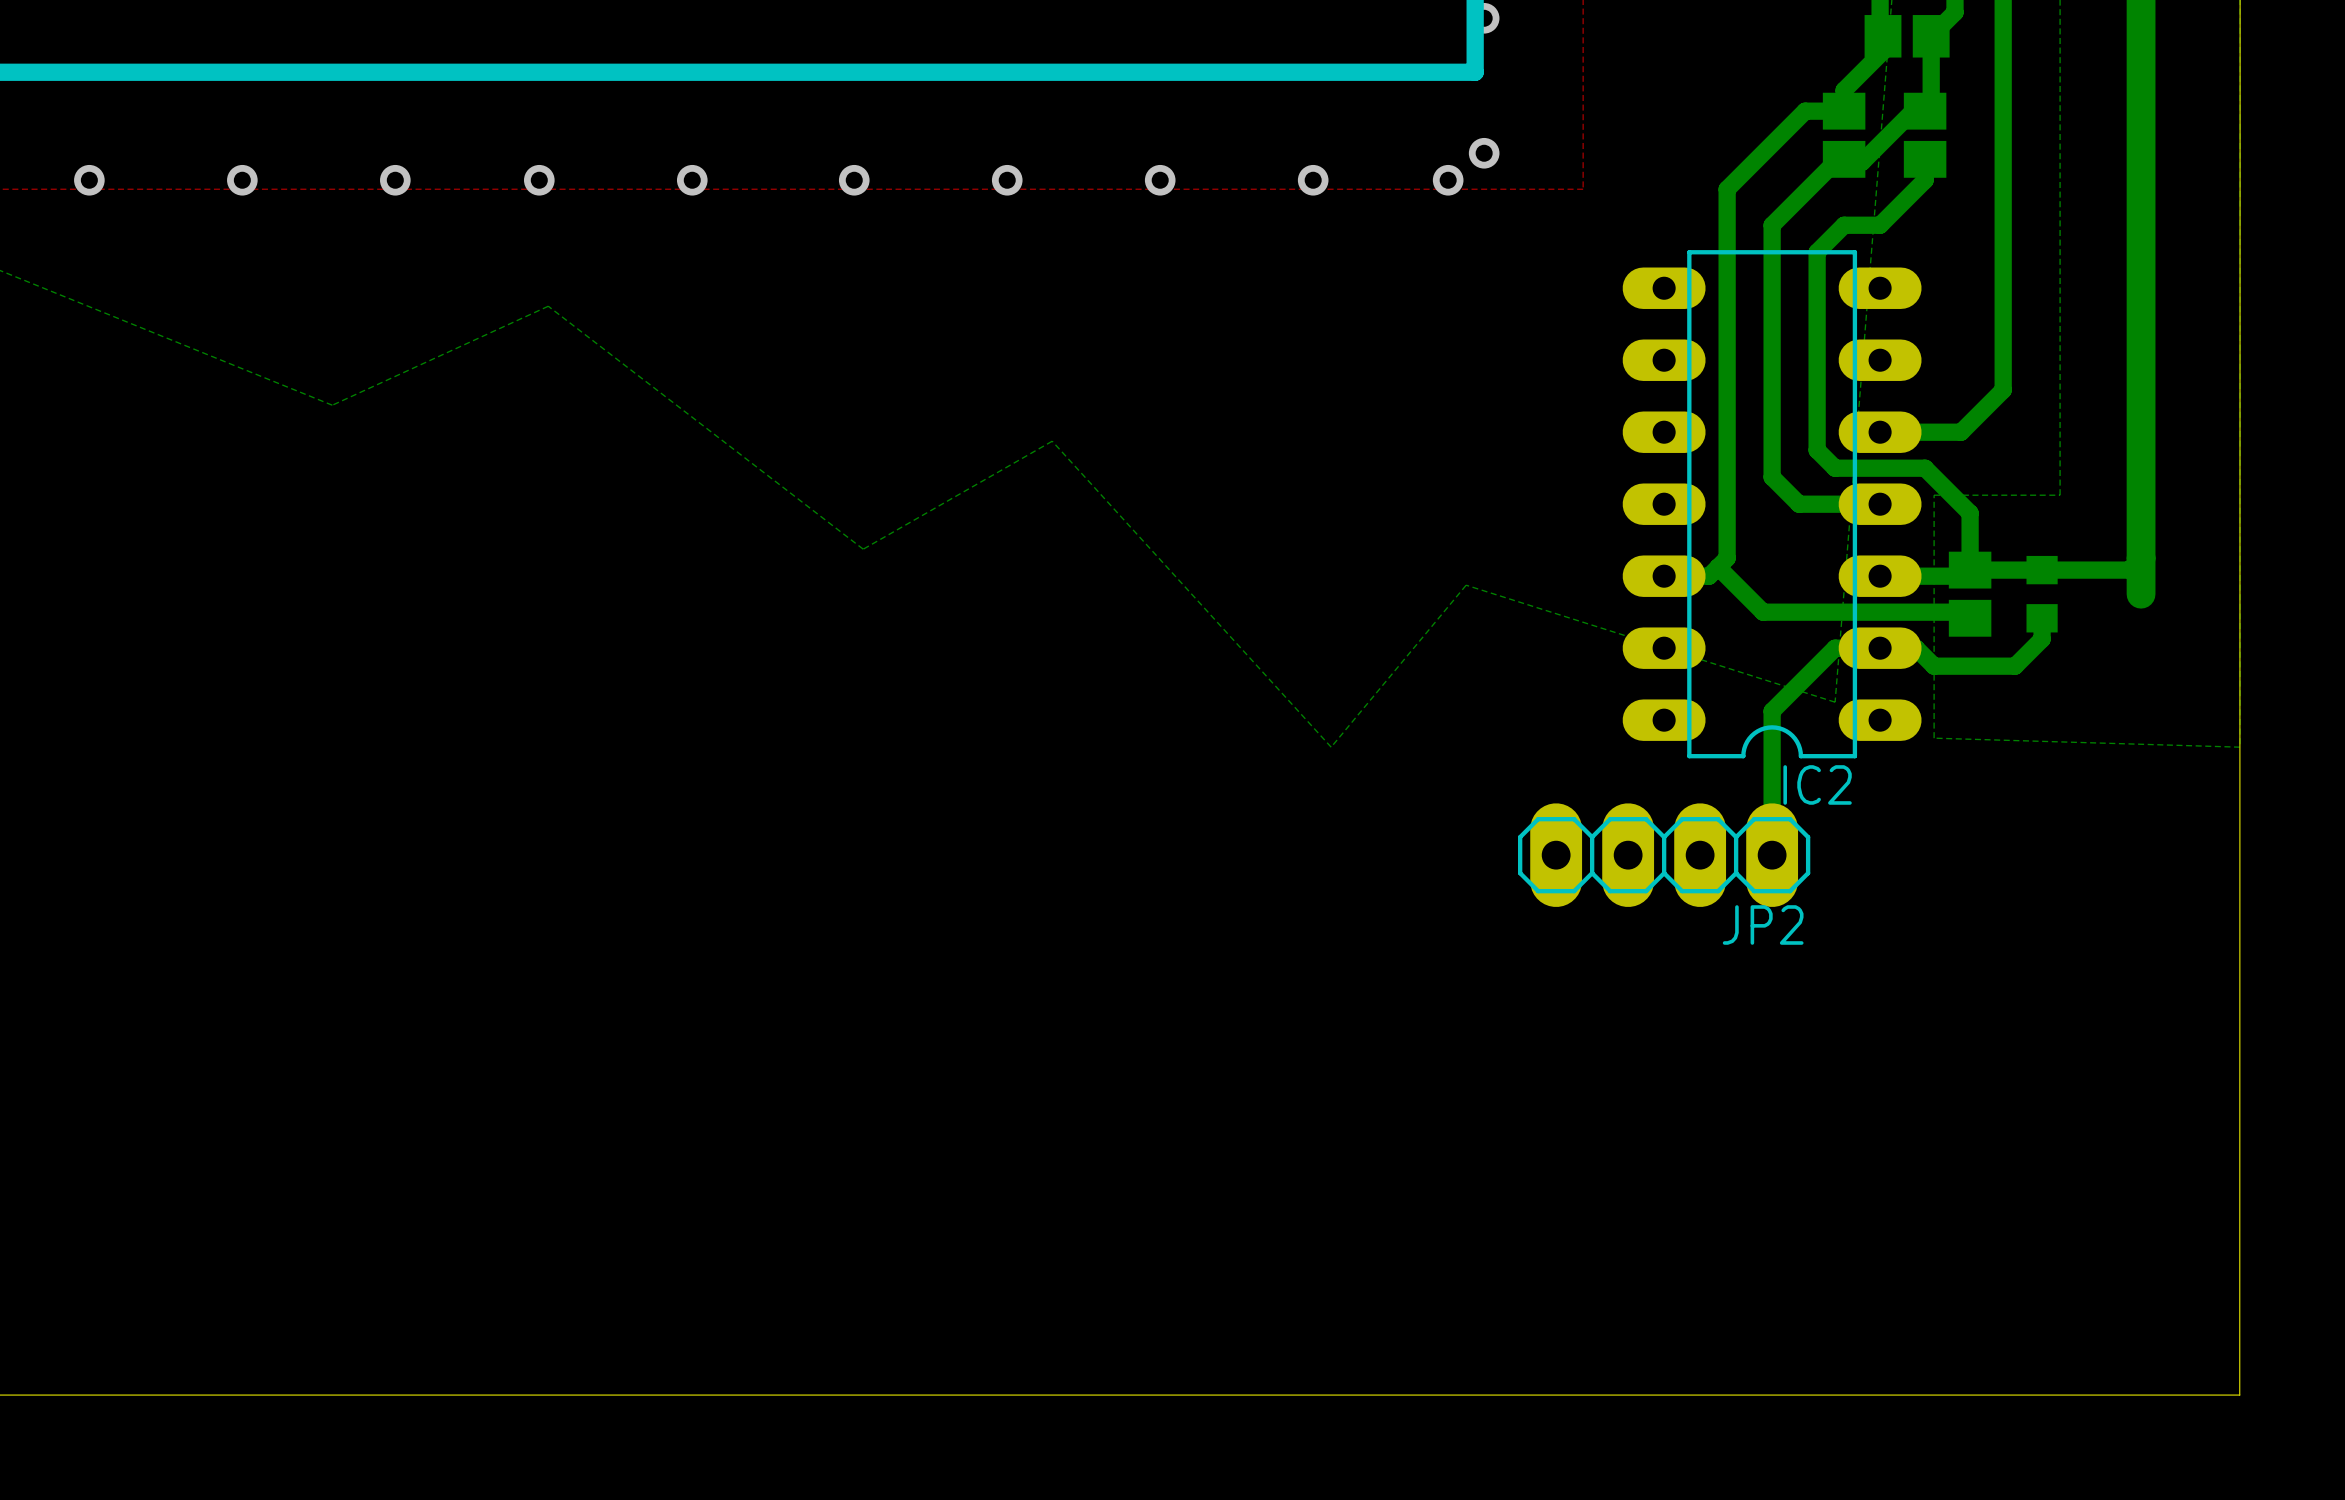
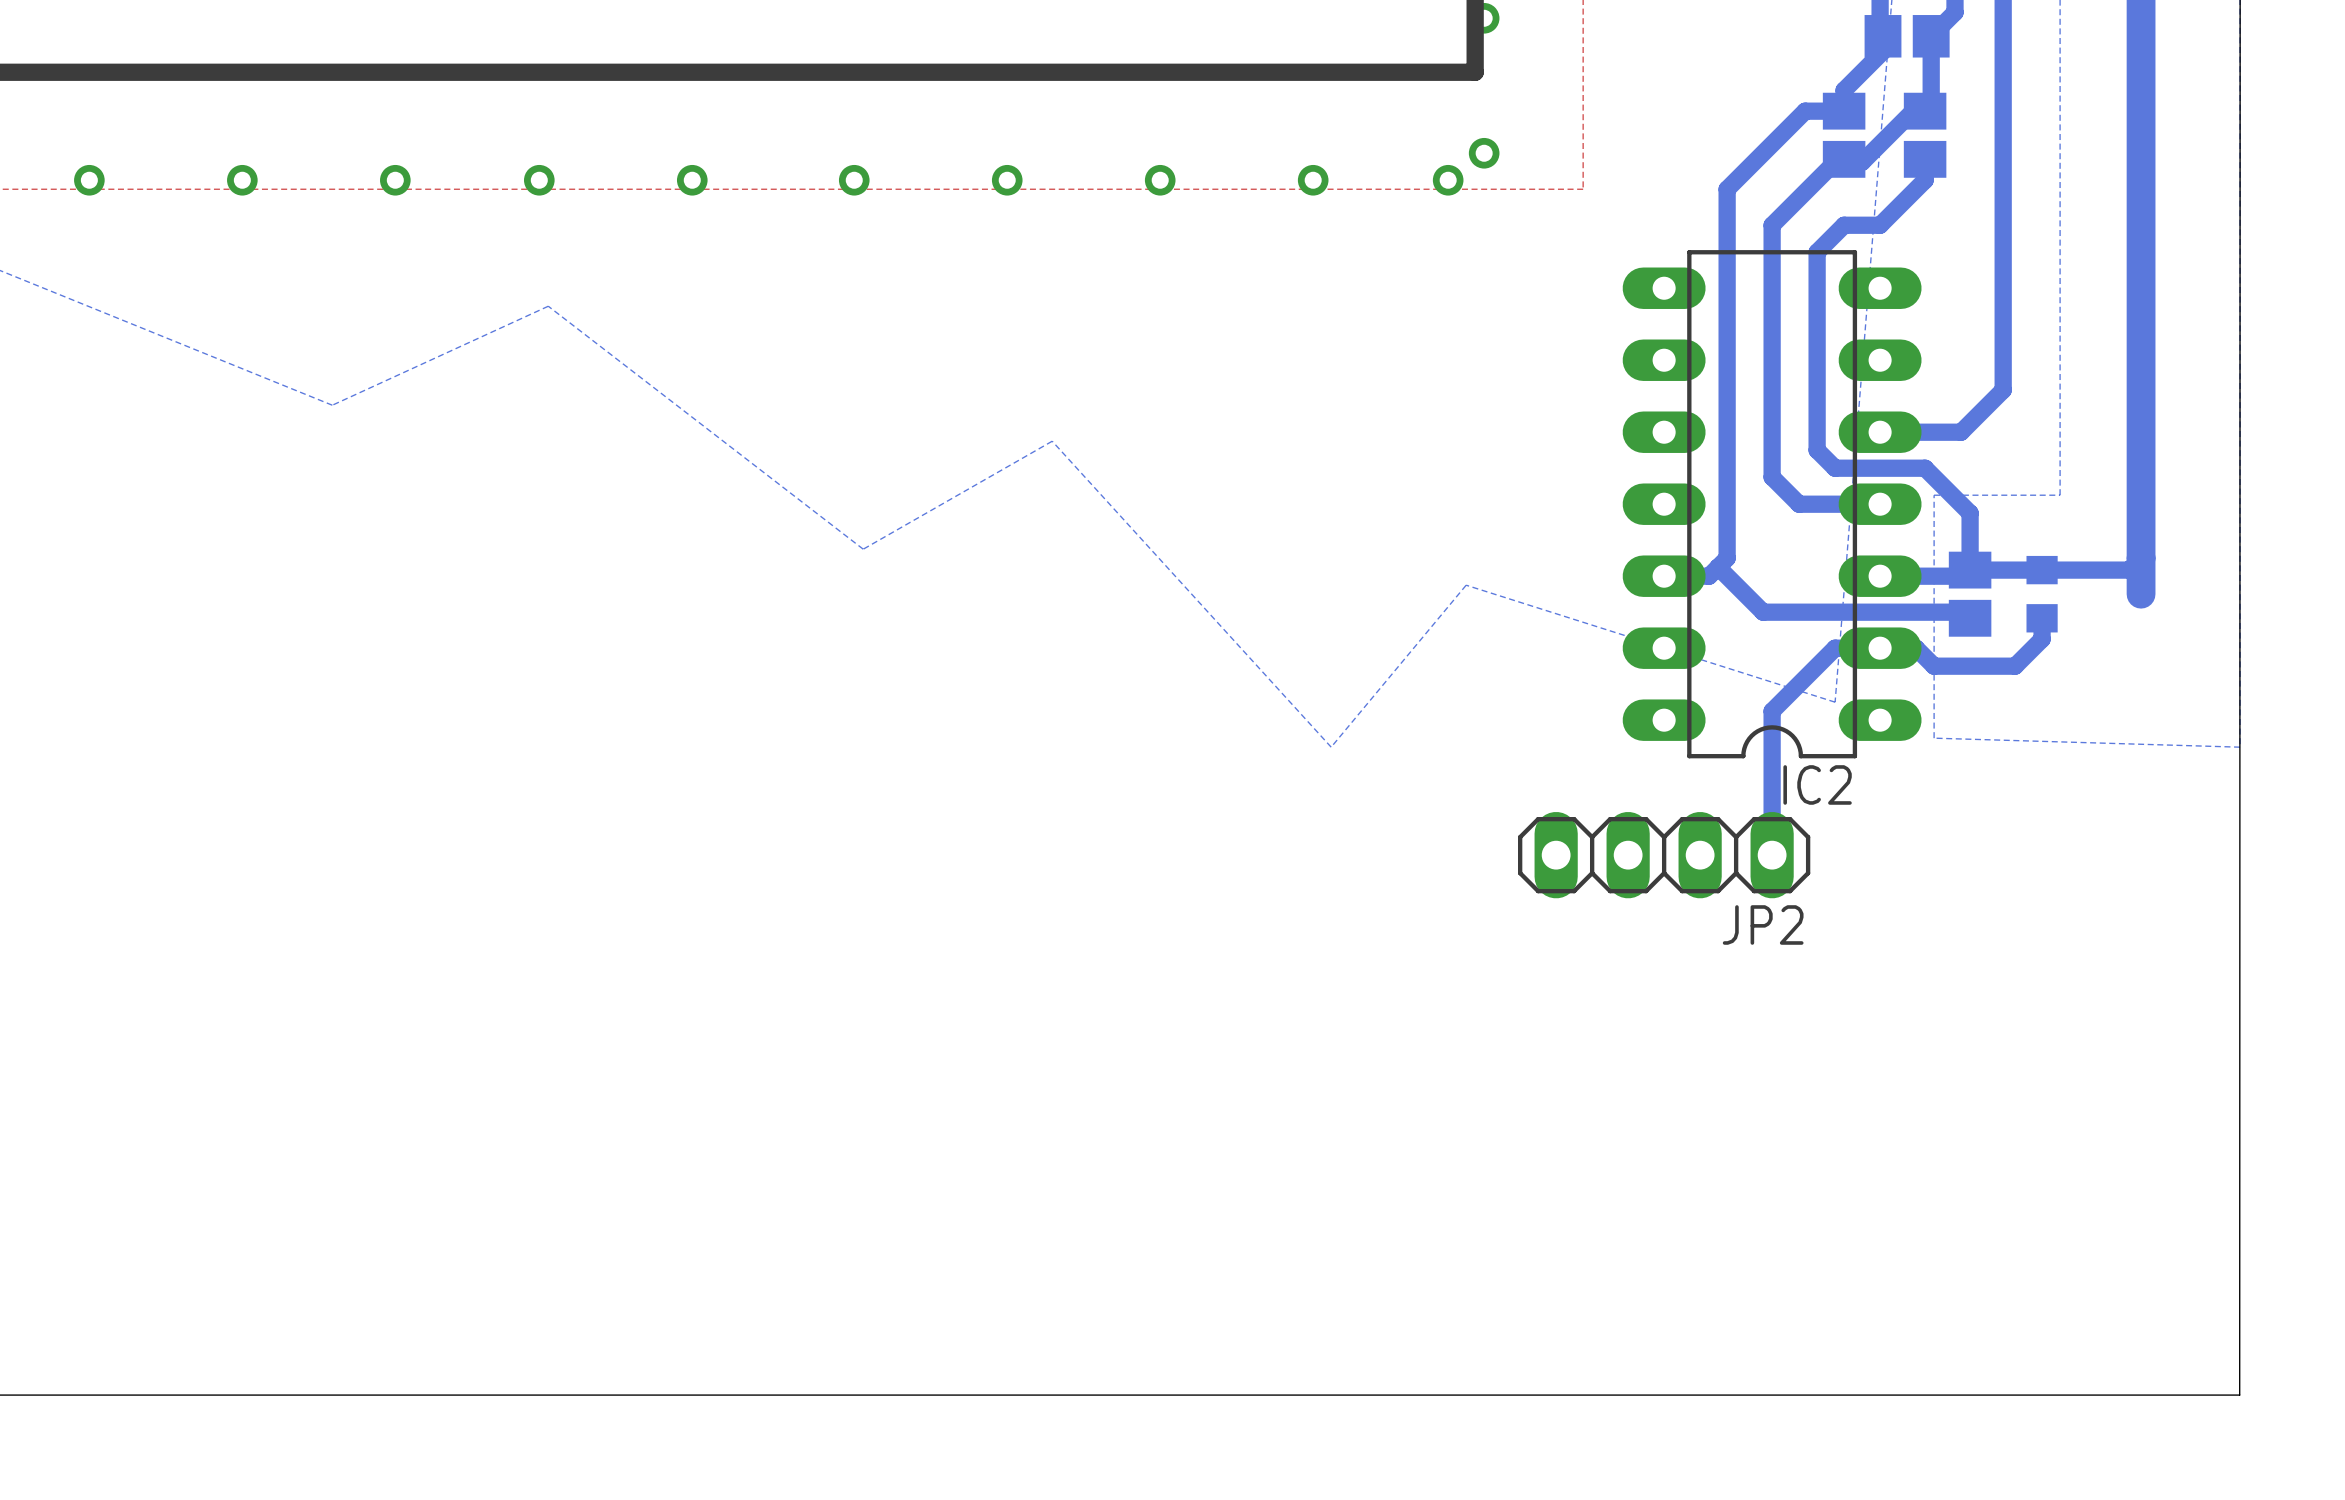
JP2 footprint: [1518, 803, 1811, 907] -> [1518, 811, 1811, 899]

